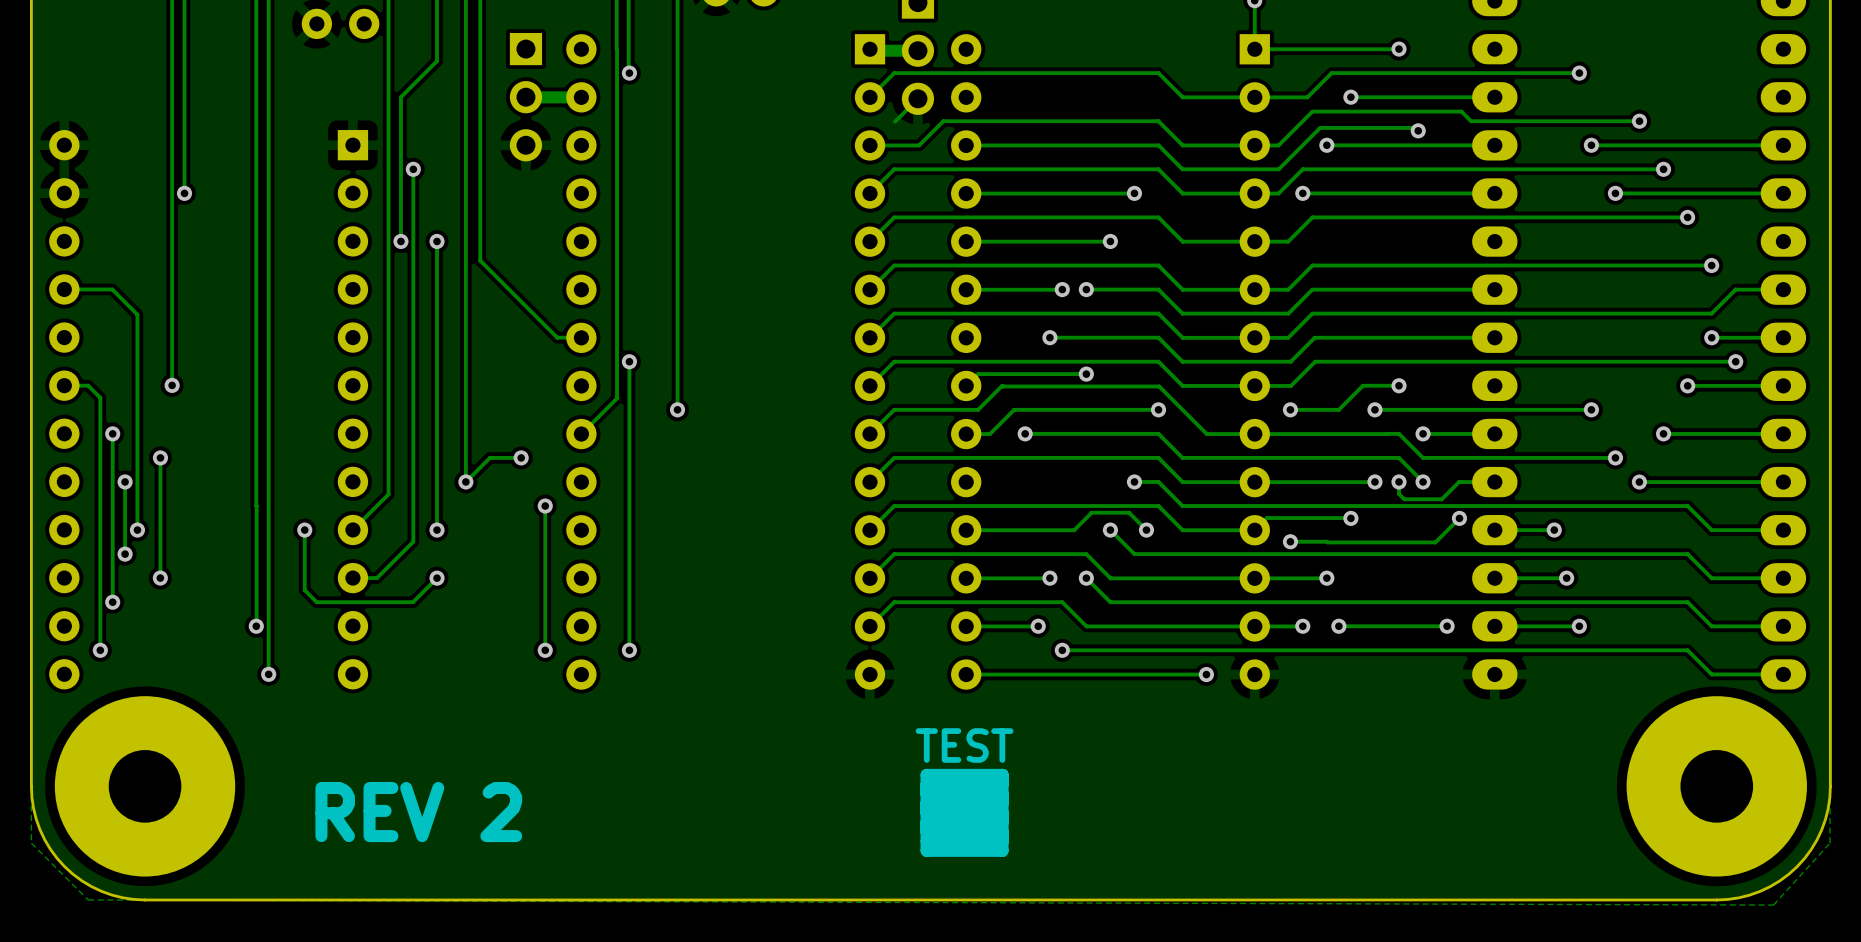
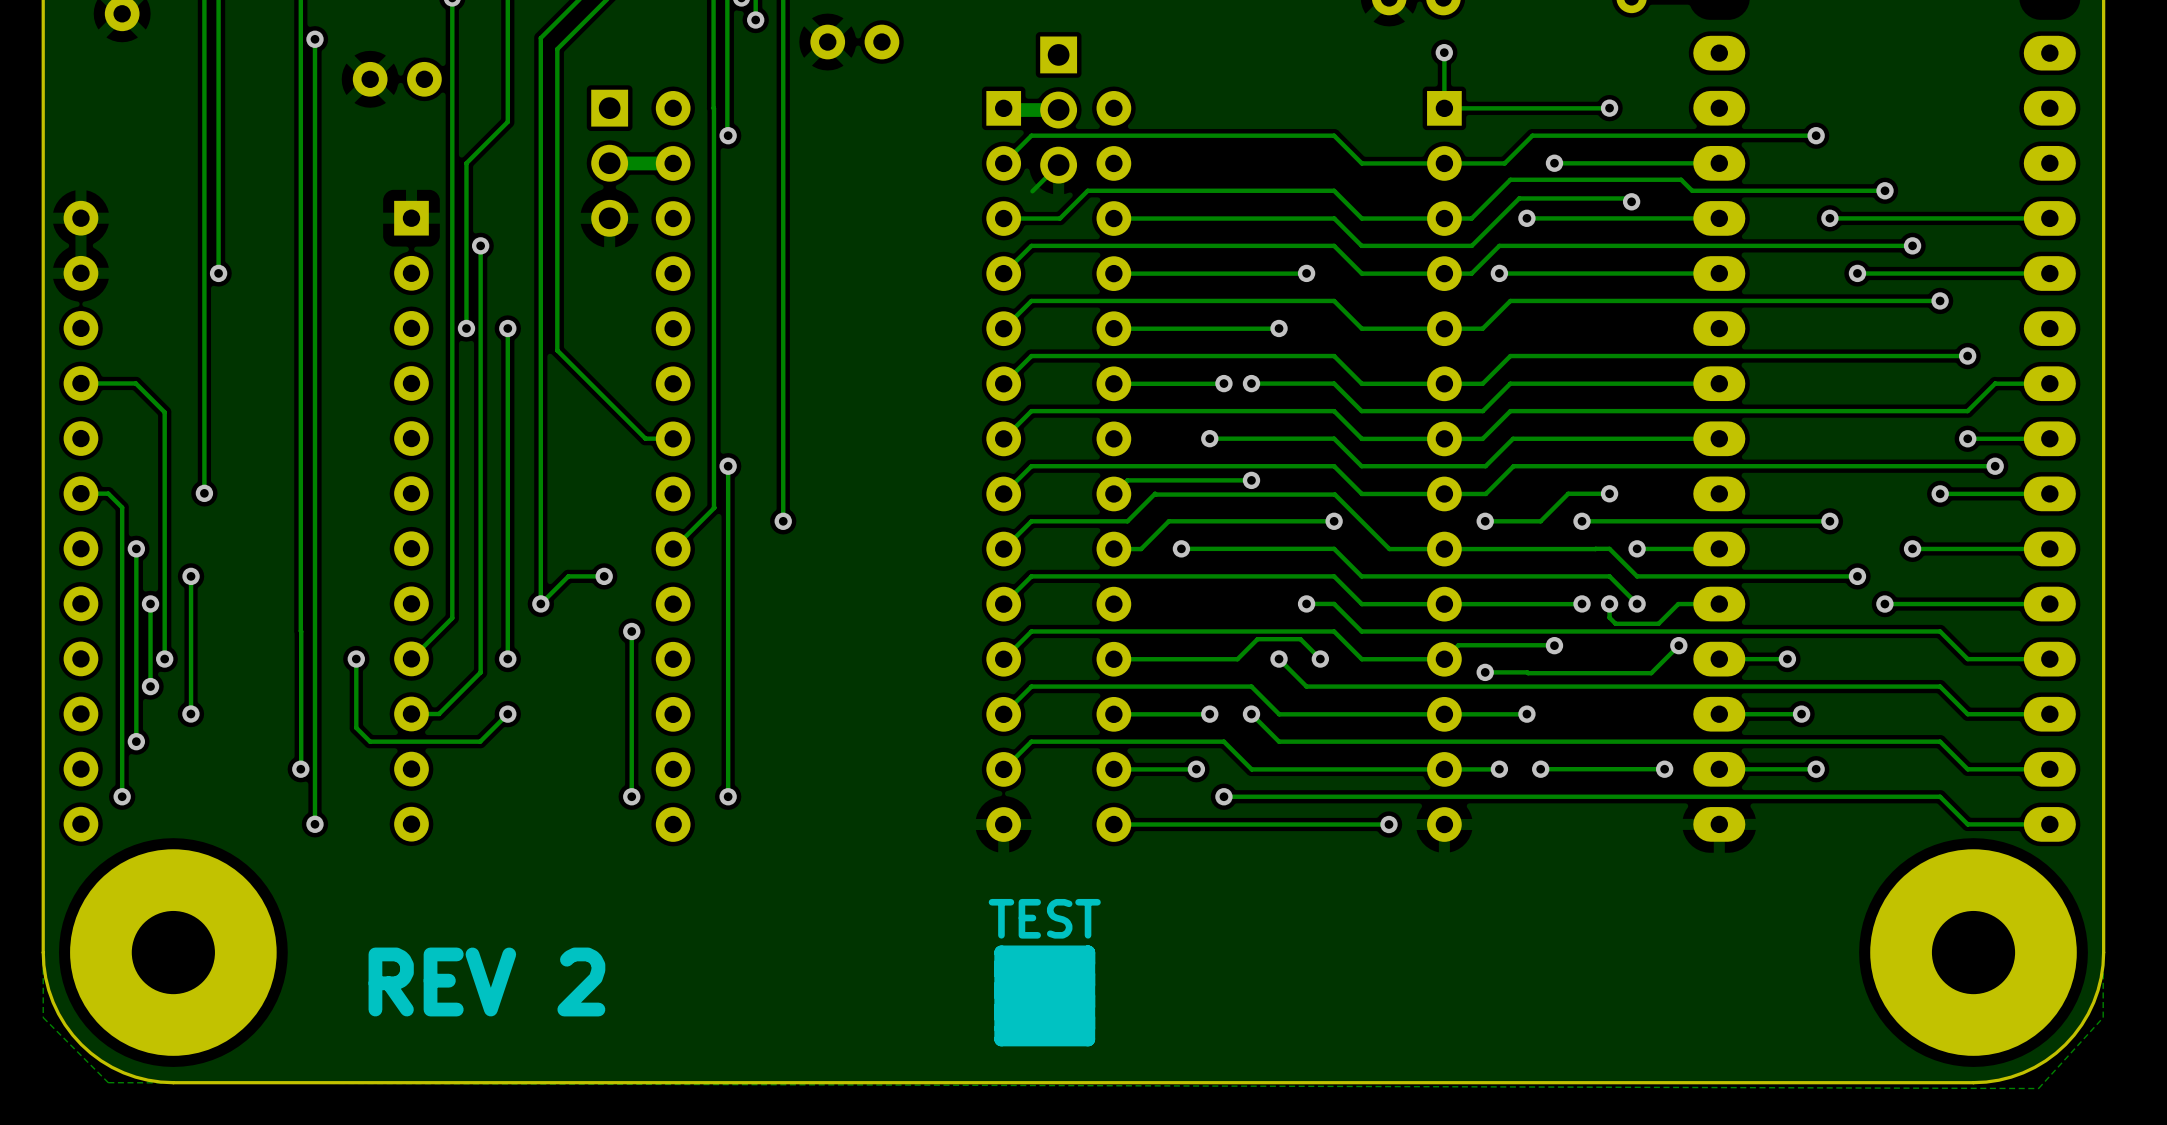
TEST position: (964, 812) -> (1044, 995)

